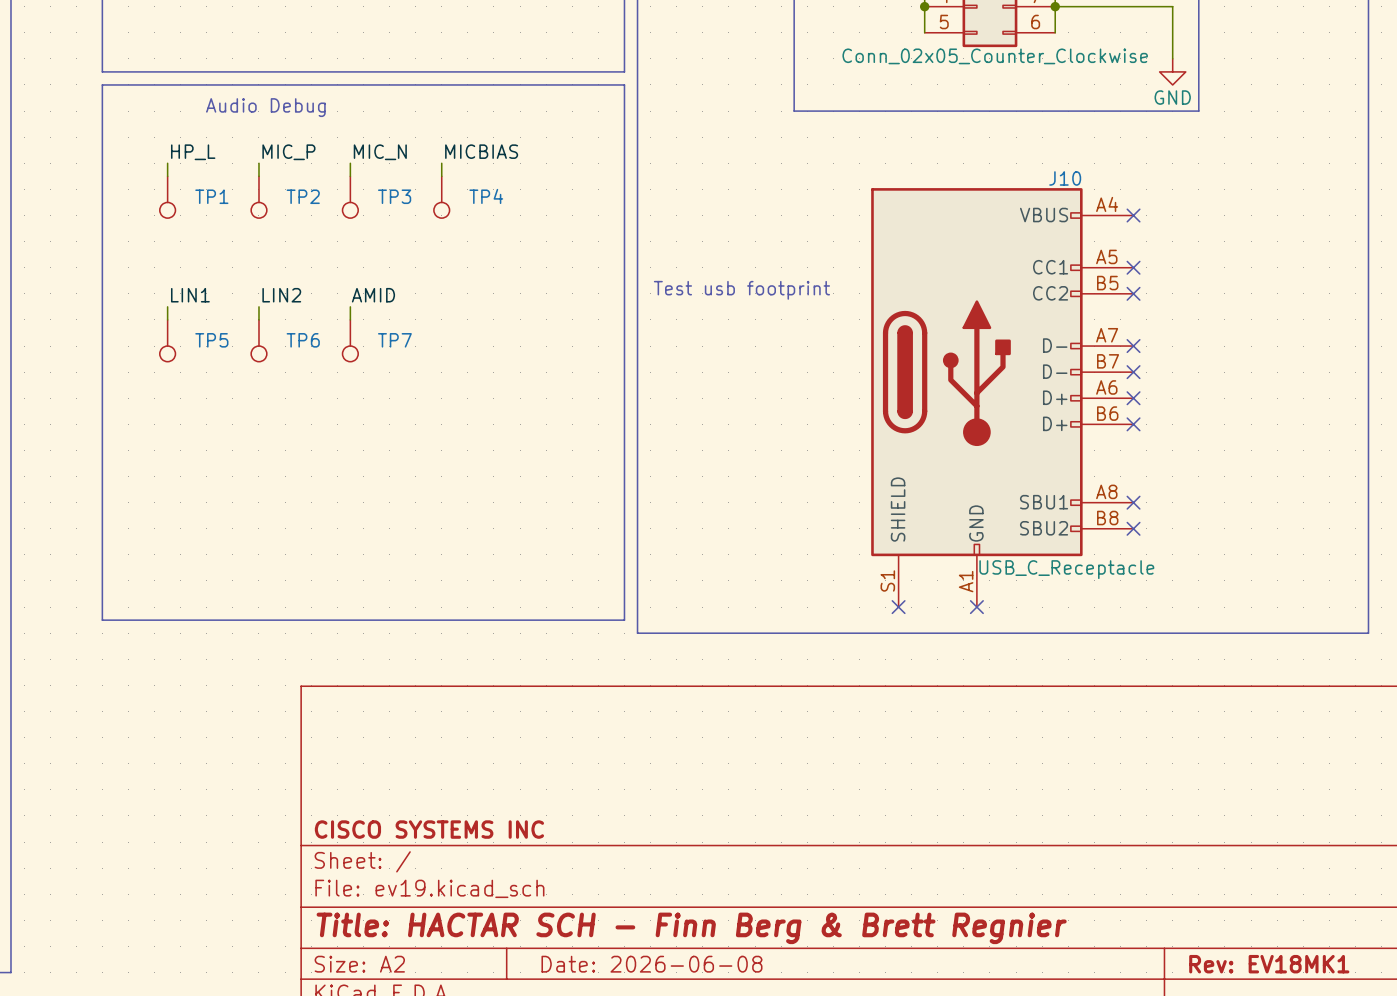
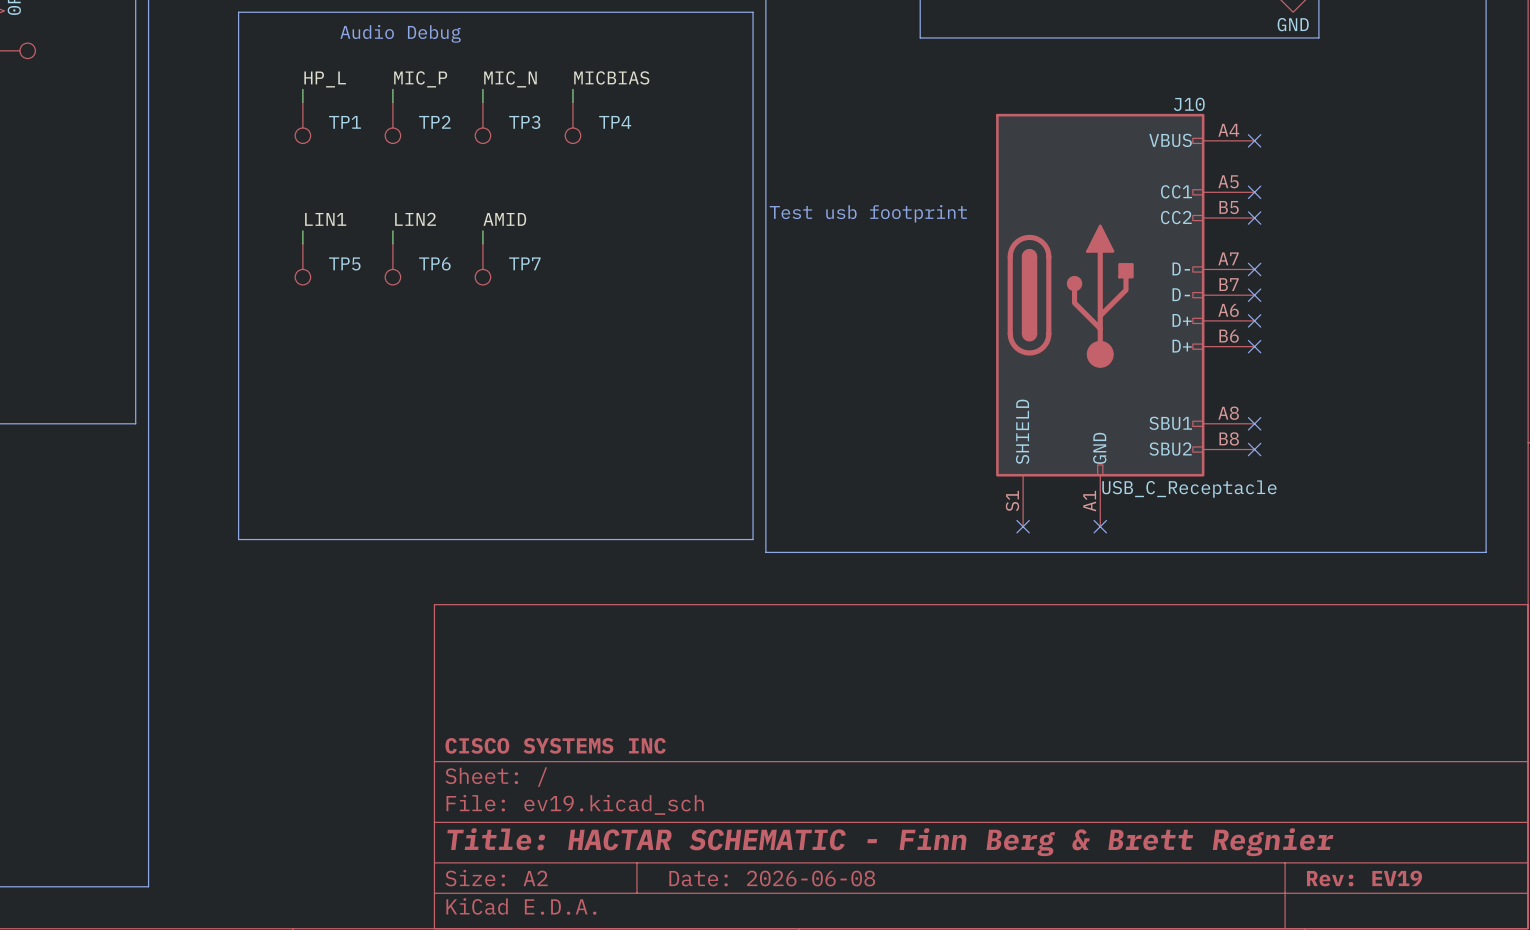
title block: Title: HACTAR SCH - Finn Berg & Brett Regnier (691, 928) -> Title: HACTAR SCHEMATIC - Finn Berg & Brett Regnier (890, 842)
title block: Rev: EV18MK1 (1269, 964) -> Rev: EV19 (1364, 878)

